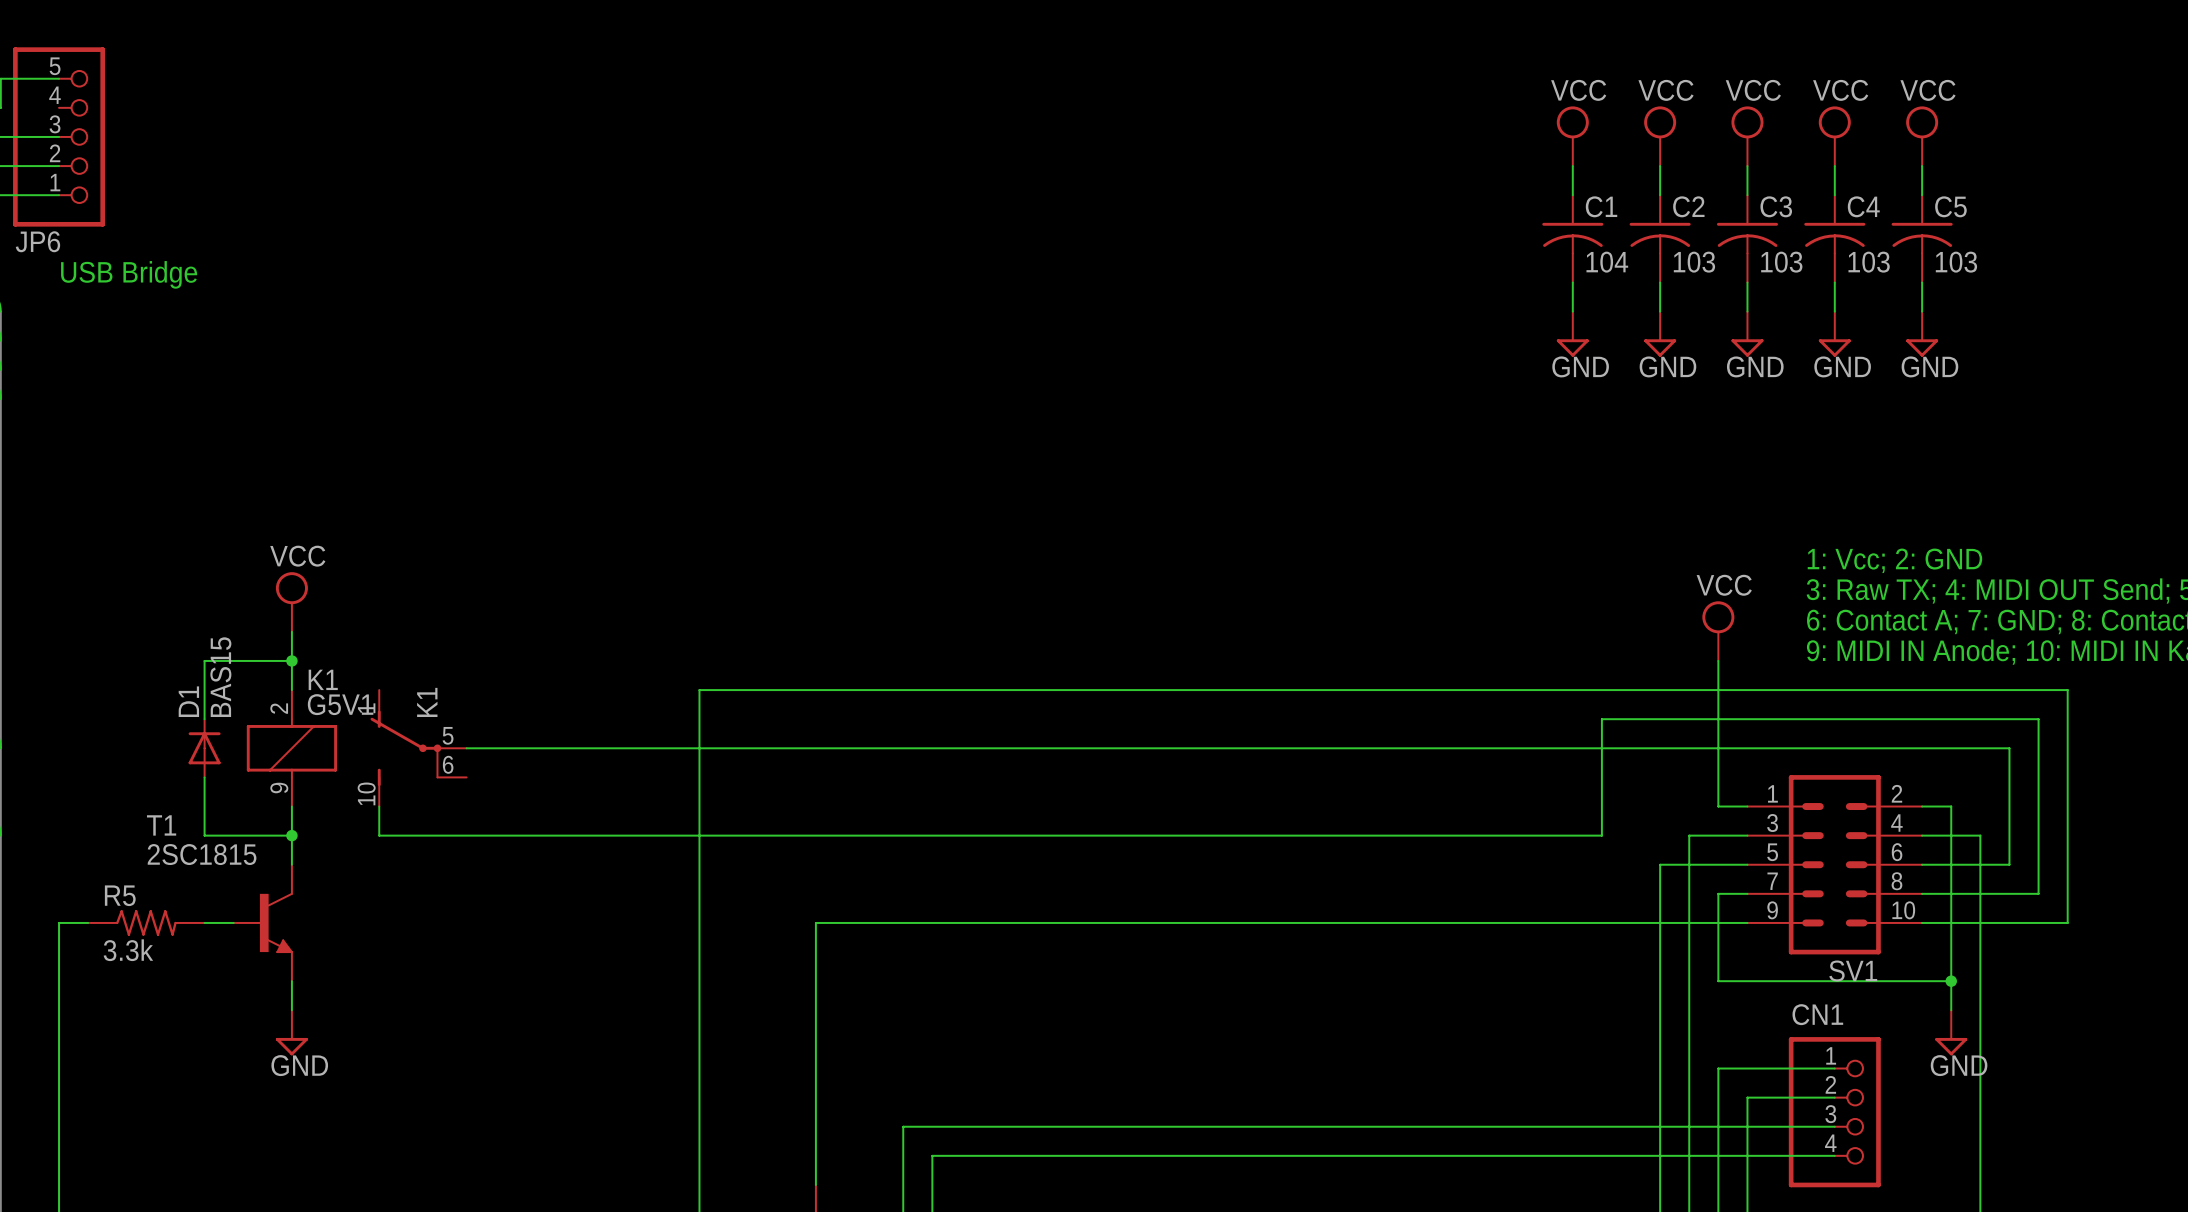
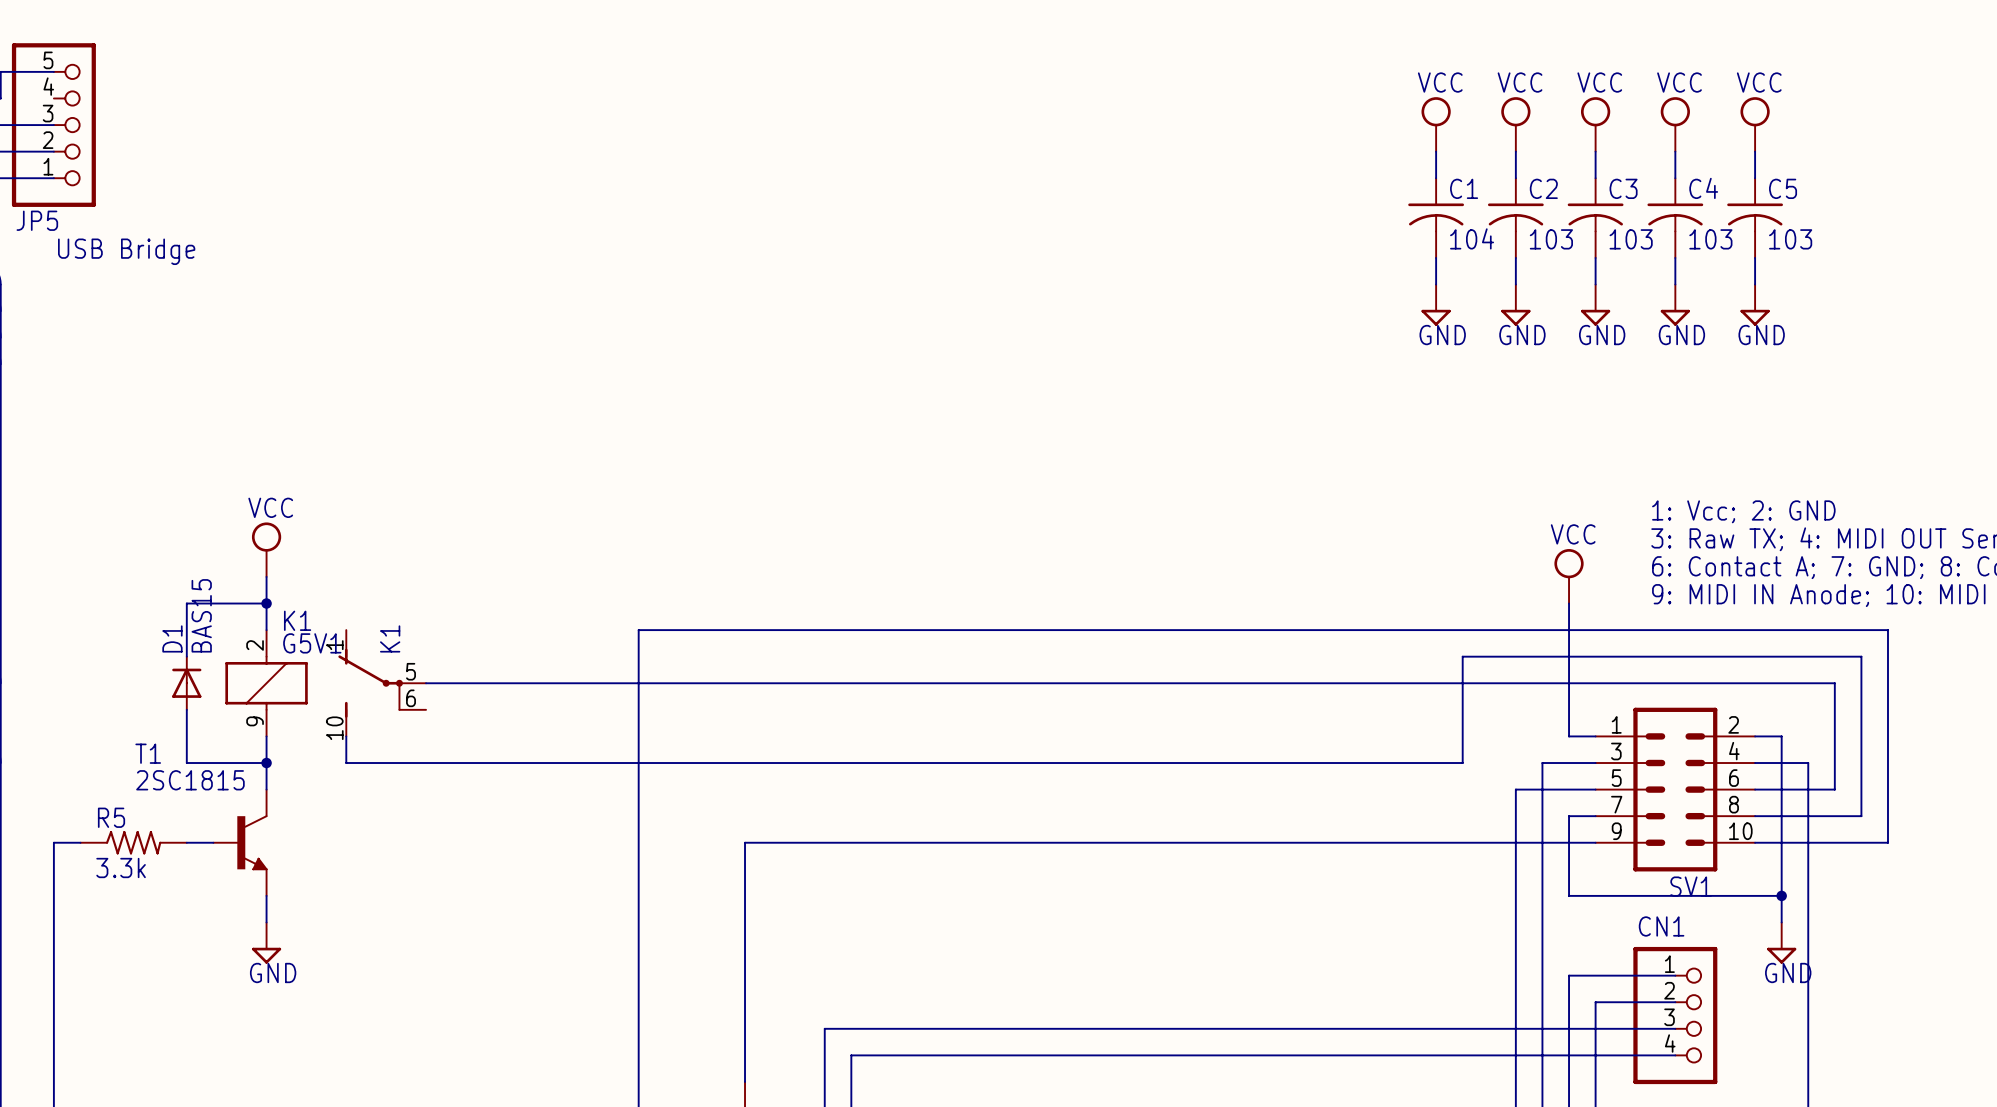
JP6 name: JP6 (37, 241) -> JP5 (37, 220)

